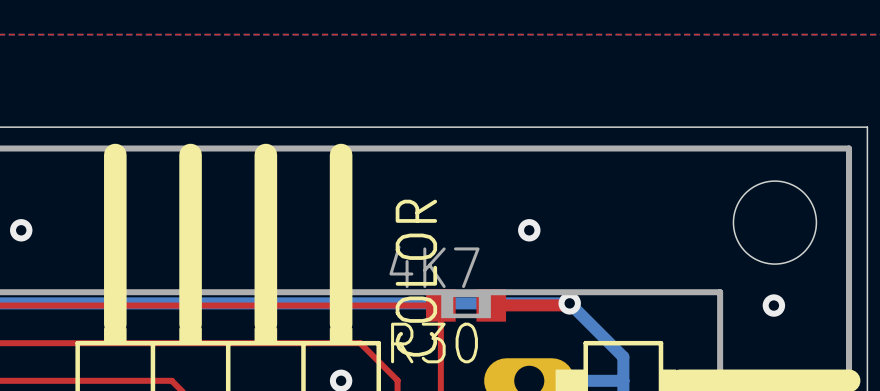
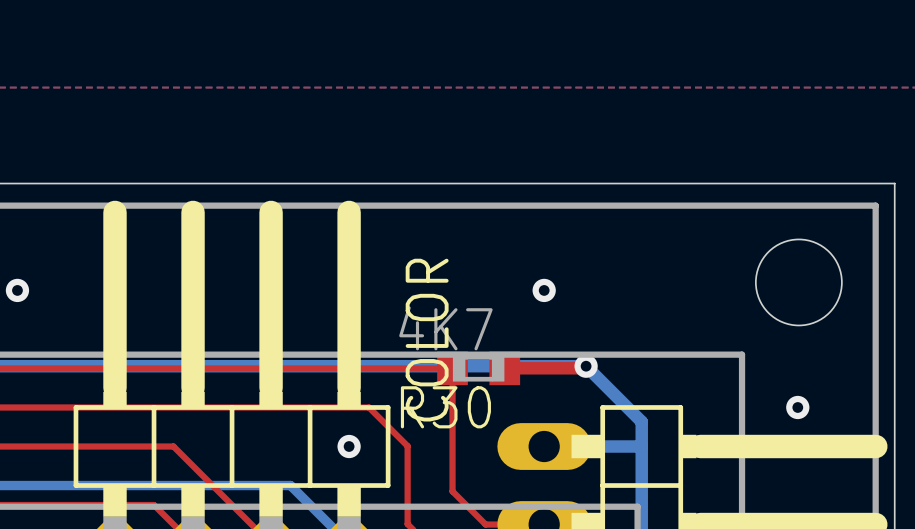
via position: (773, 305) -> (797, 407)

